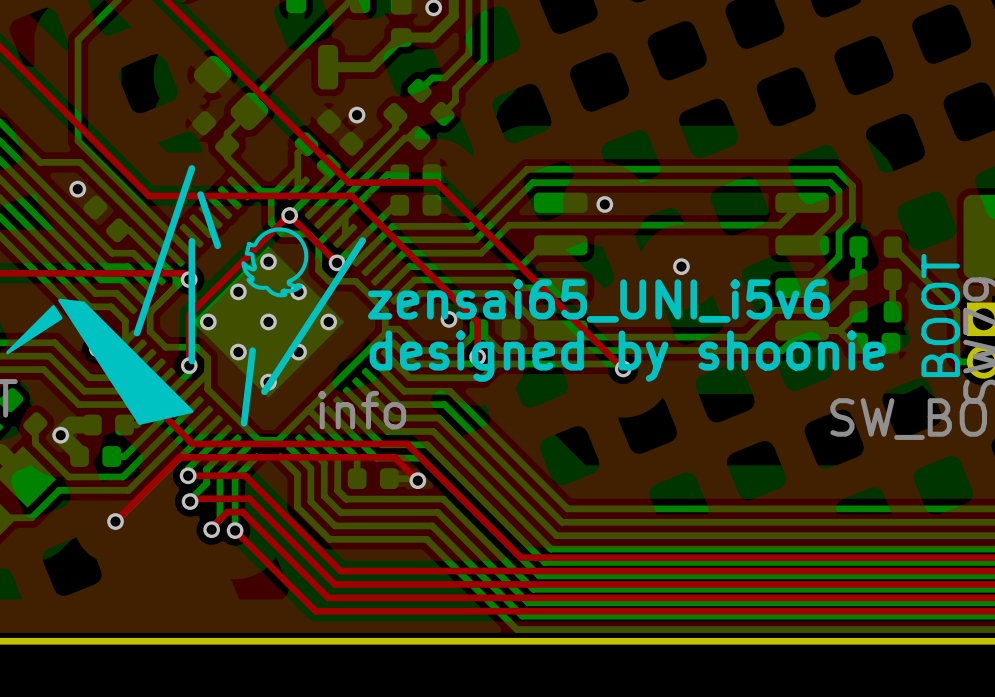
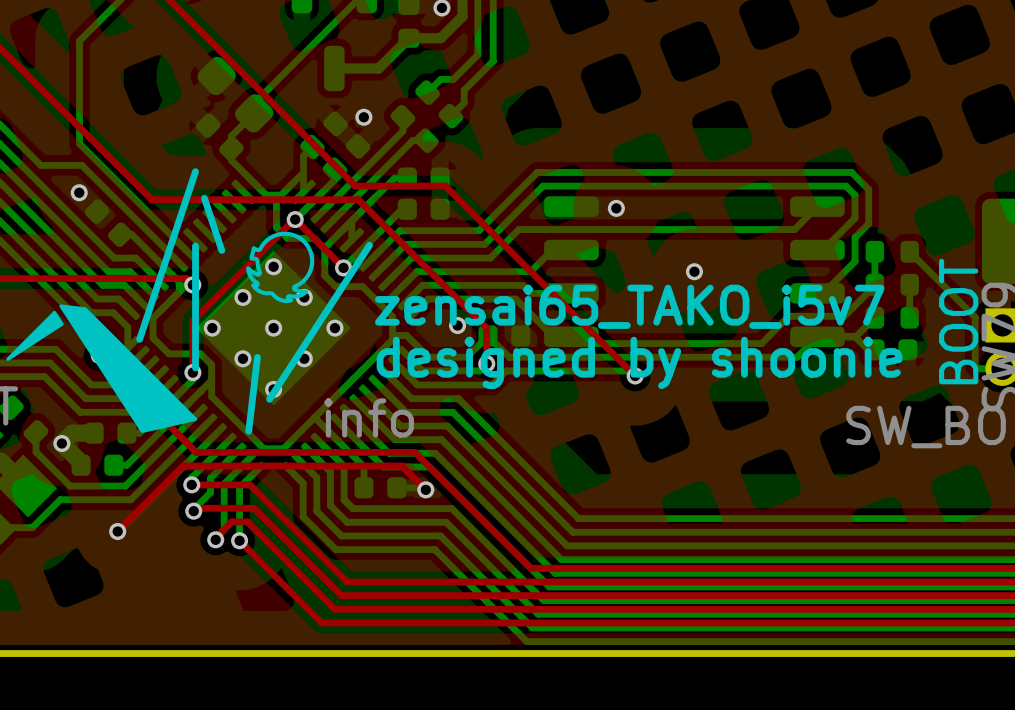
drawing shape: [6, 165, 886, 430] -> [6, 168, 903, 438]

